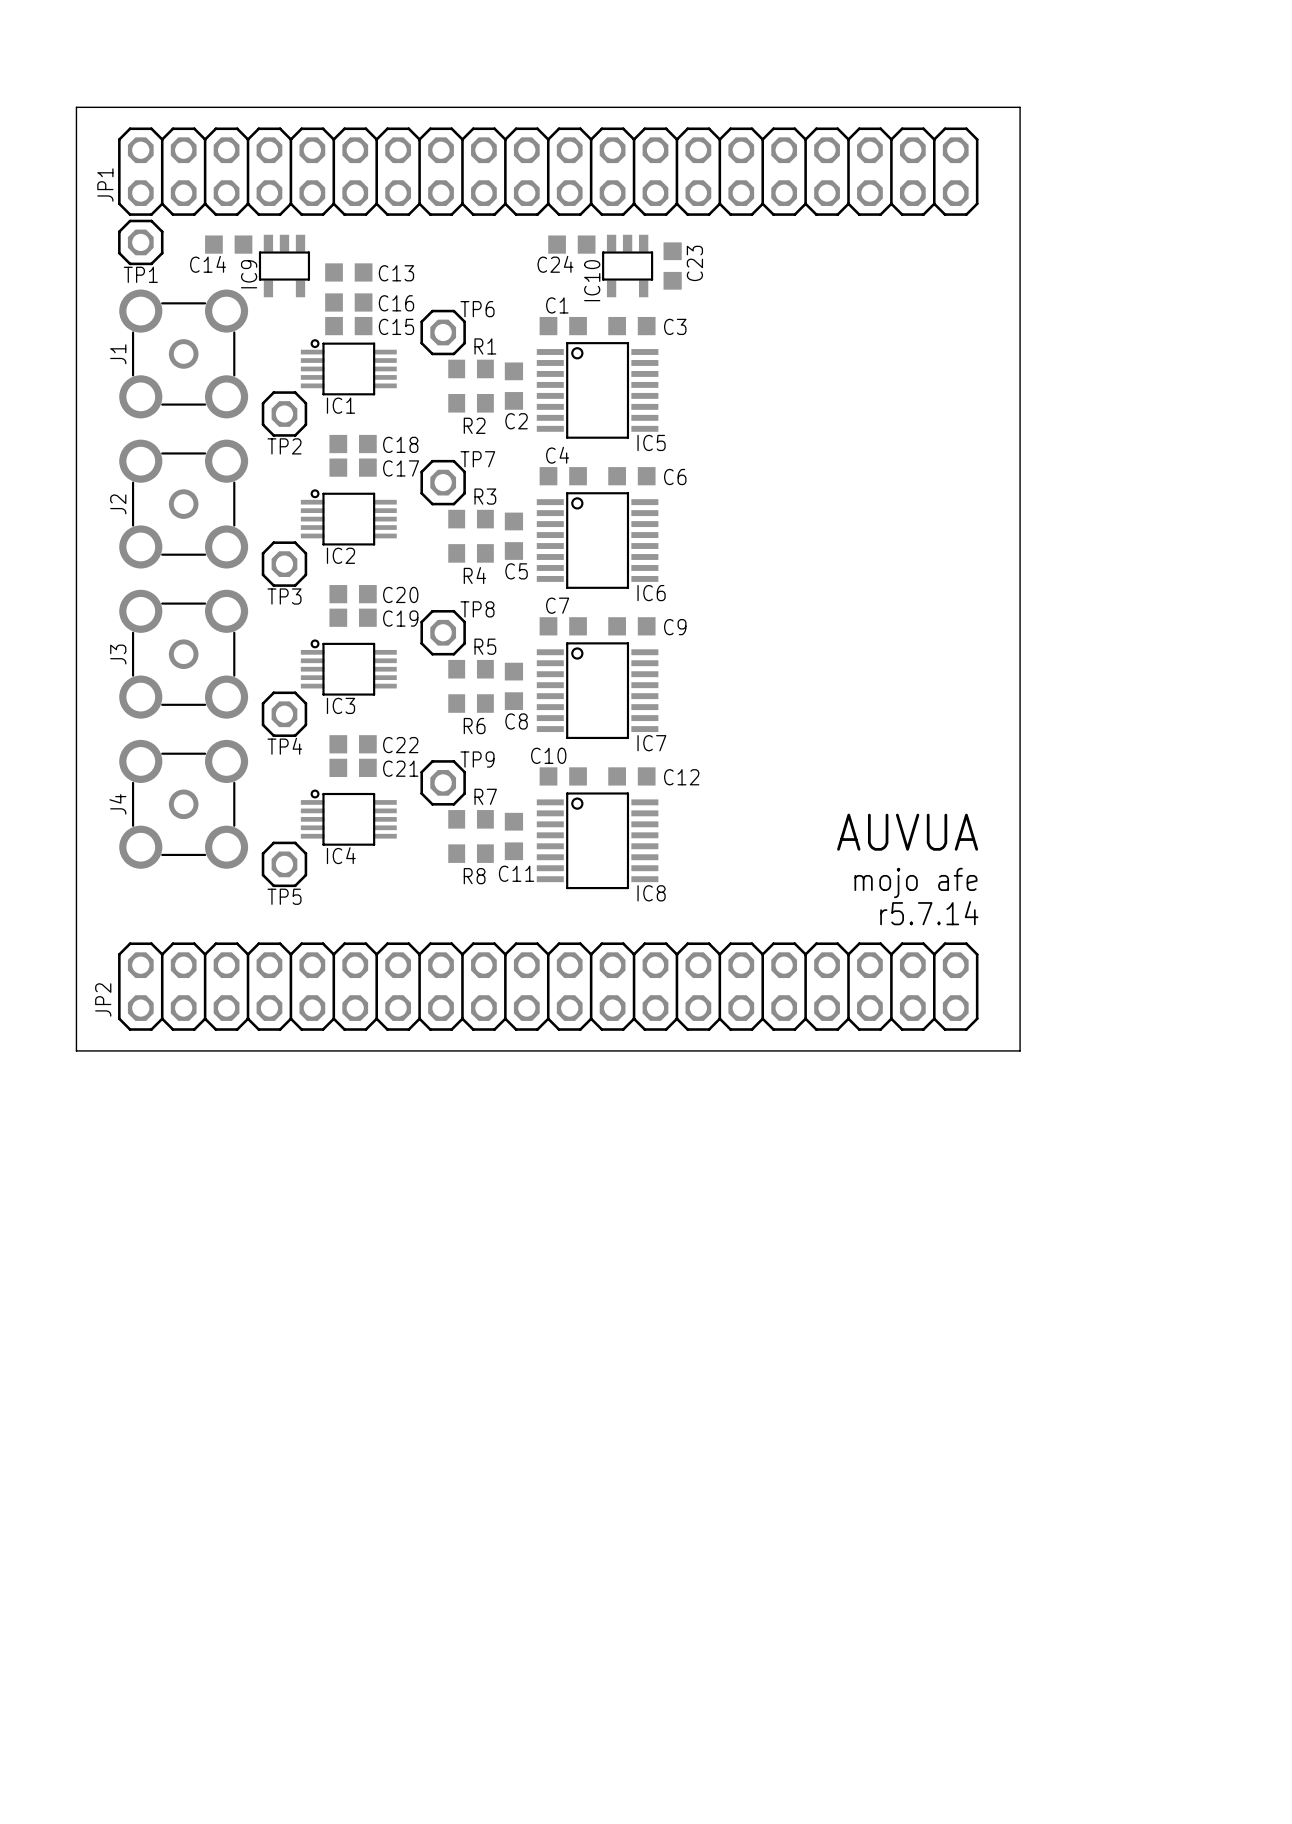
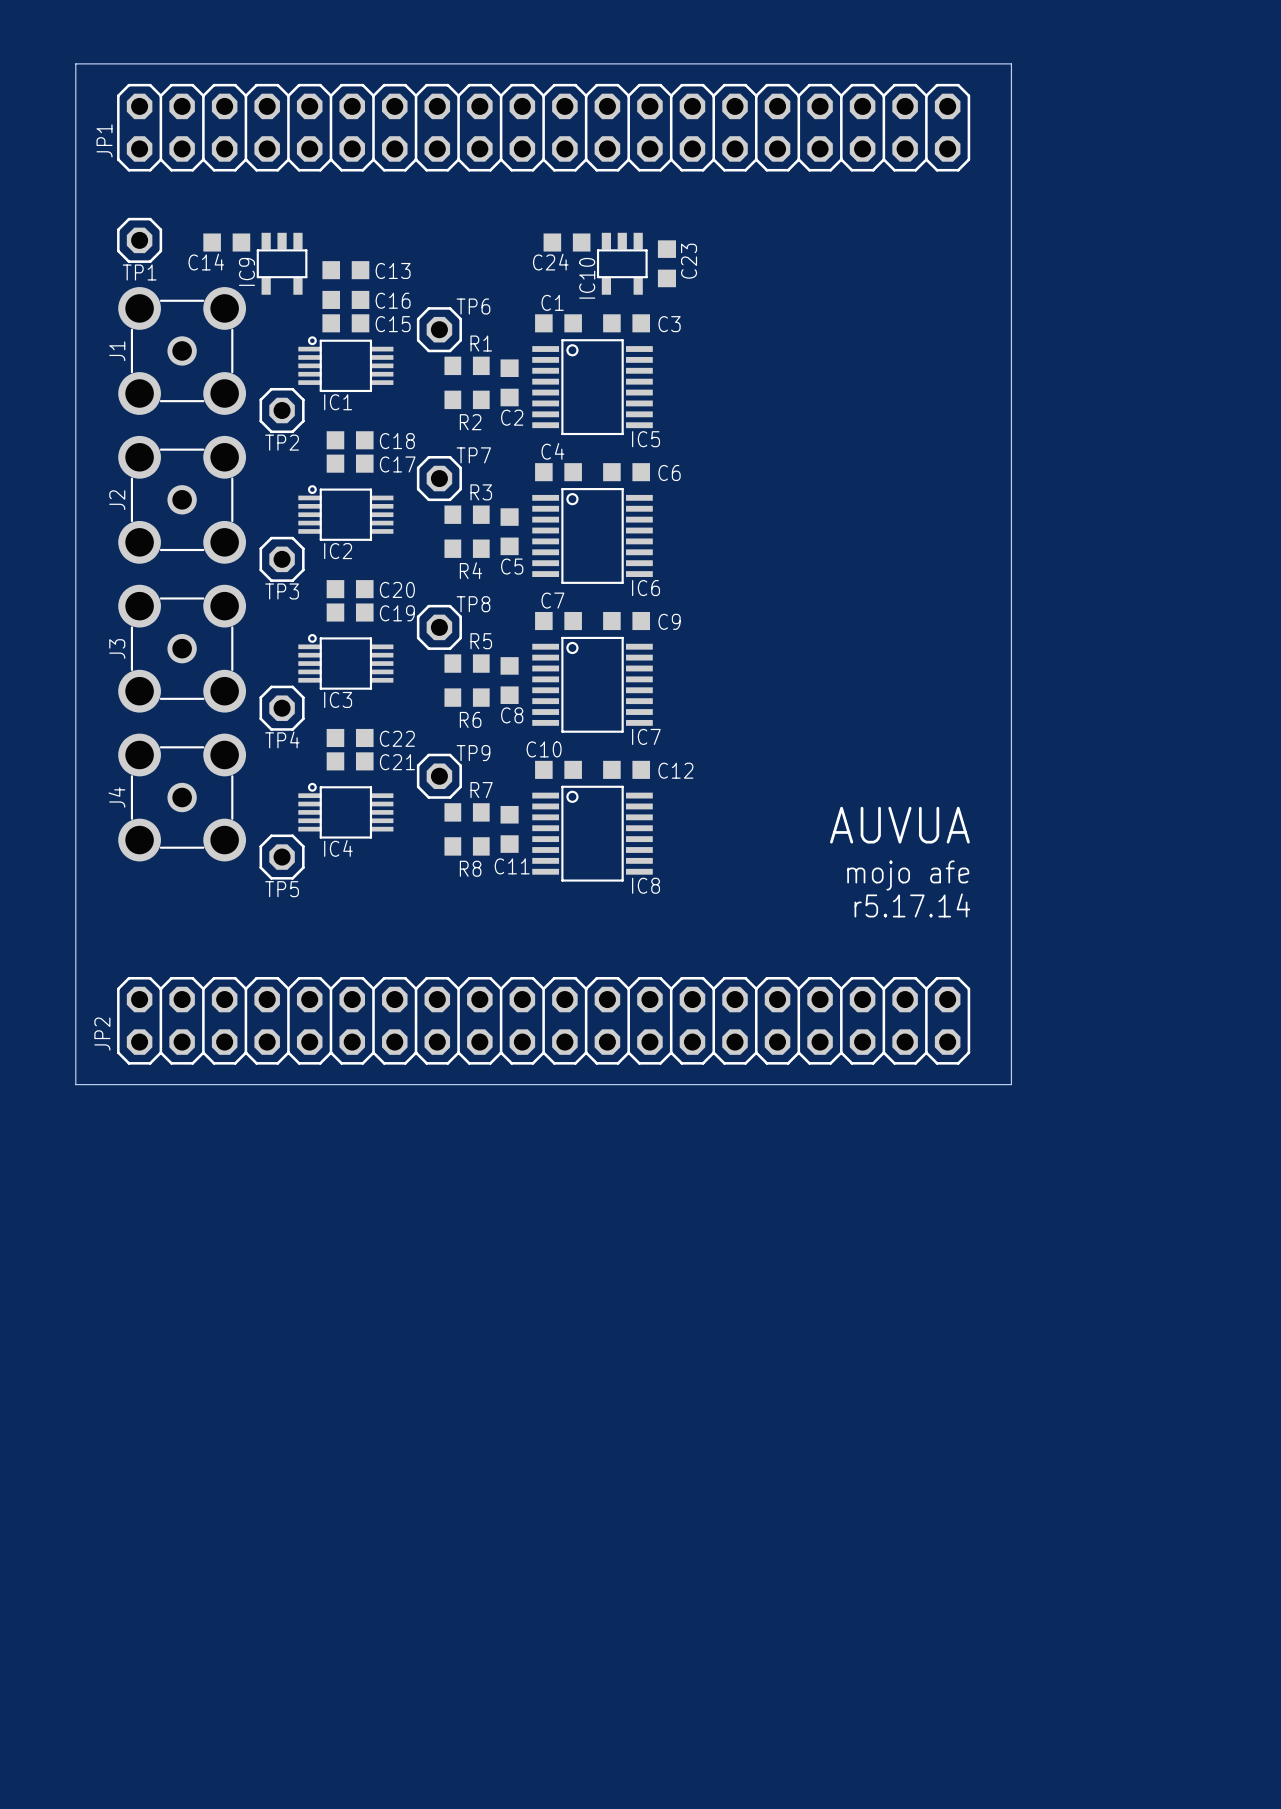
board edge: (76, 107) (1020, 107) -> (75, 106) (75, 63) (1011, 63) (1011, 106)
JP1 position: (548, 171) -> (543, 127)
text: r5.7.14 (929, 913) -> r5.17.14 (912, 905)
JP2 position: (548, 986) -> (543, 1020)
board edge: (76, 1050) (1020, 1050) -> (75, 1042) (75, 1084) (1011, 1084) (1011, 1042)

